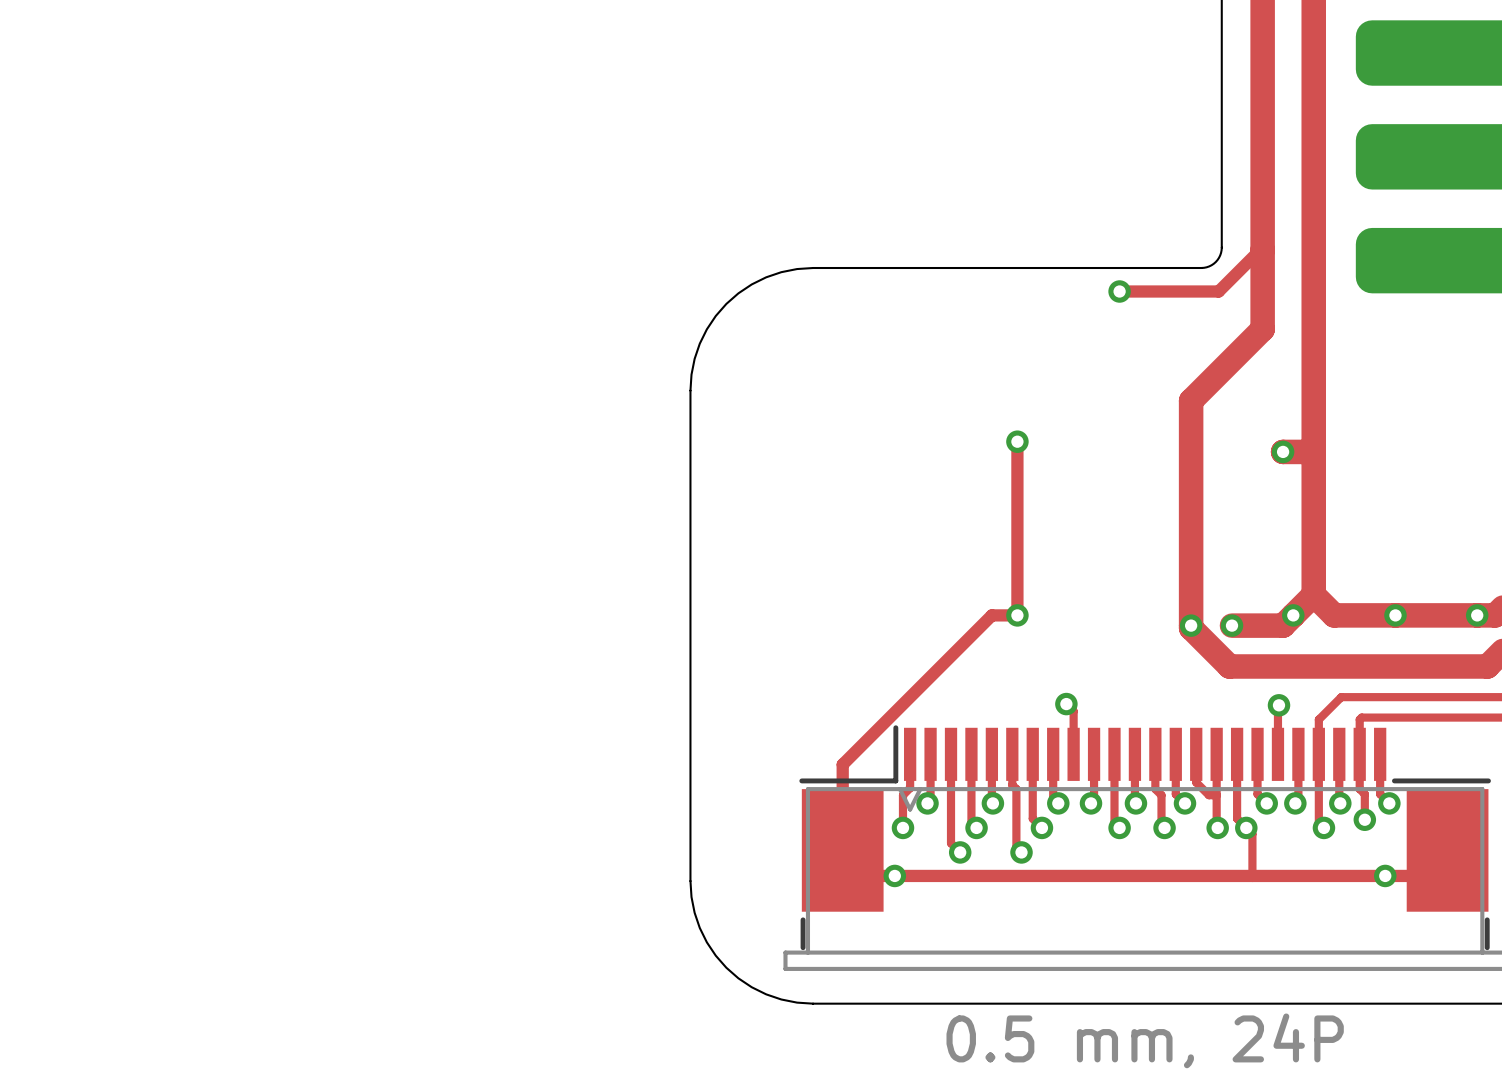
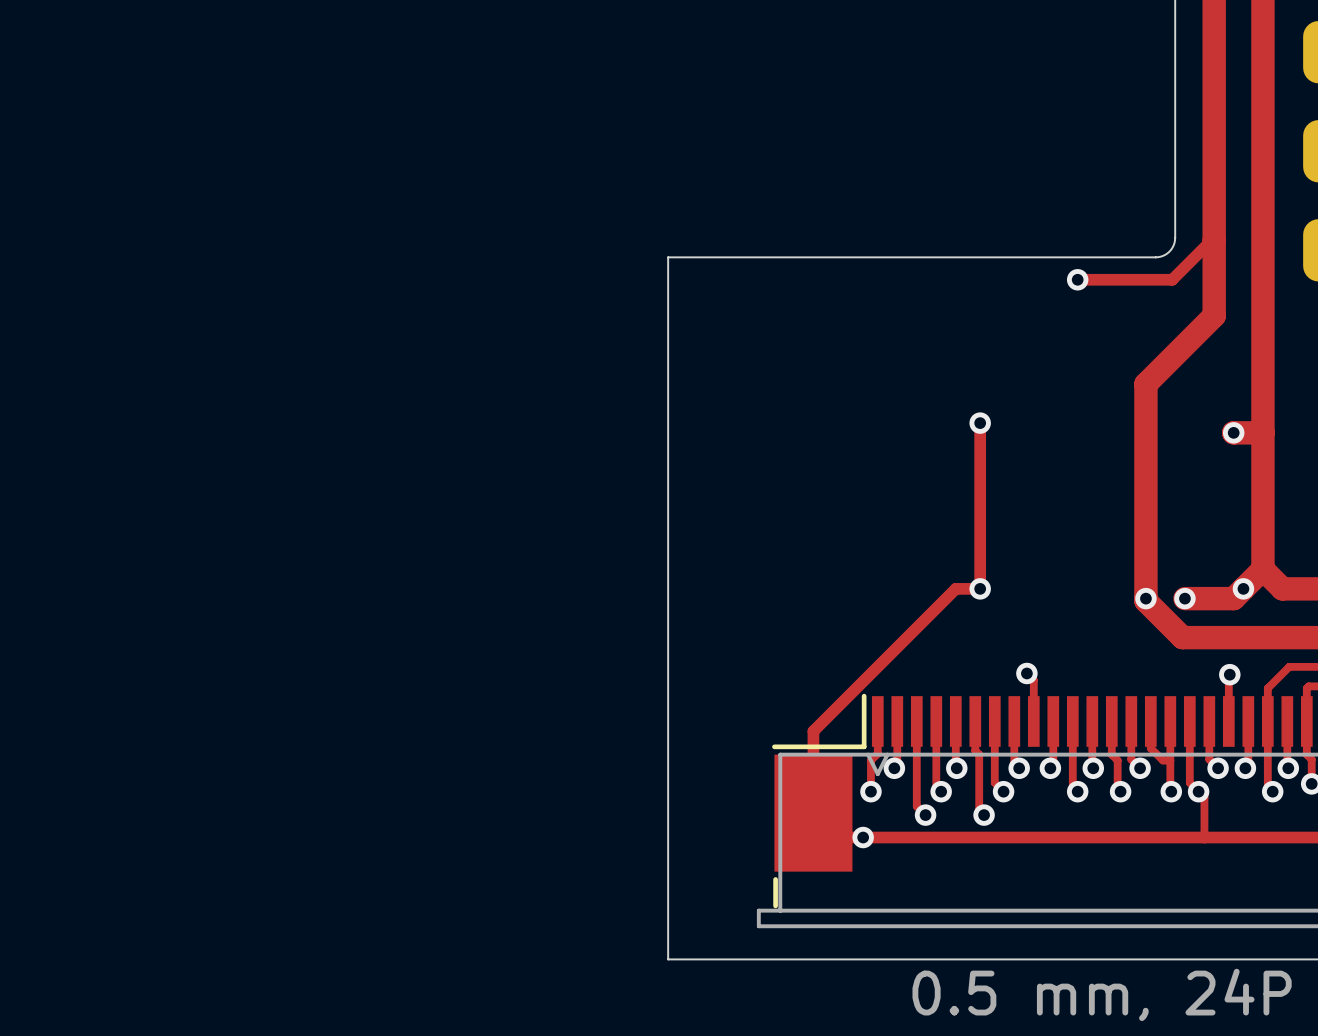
board edge: (813, 268) (797, 269) (766, 277) (738, 293) (726, 303) (706, 329) (699, 343) (691, 374) (690, 390) -> (785, 257) (668, 257) (668, 374)
board edge: (690, 881) (691, 897) (699, 927) (706, 942) (726, 967) (751, 987) (766, 994) (781, 999) (813, 1003) -> (668, 842) (668, 959) (785, 959)

